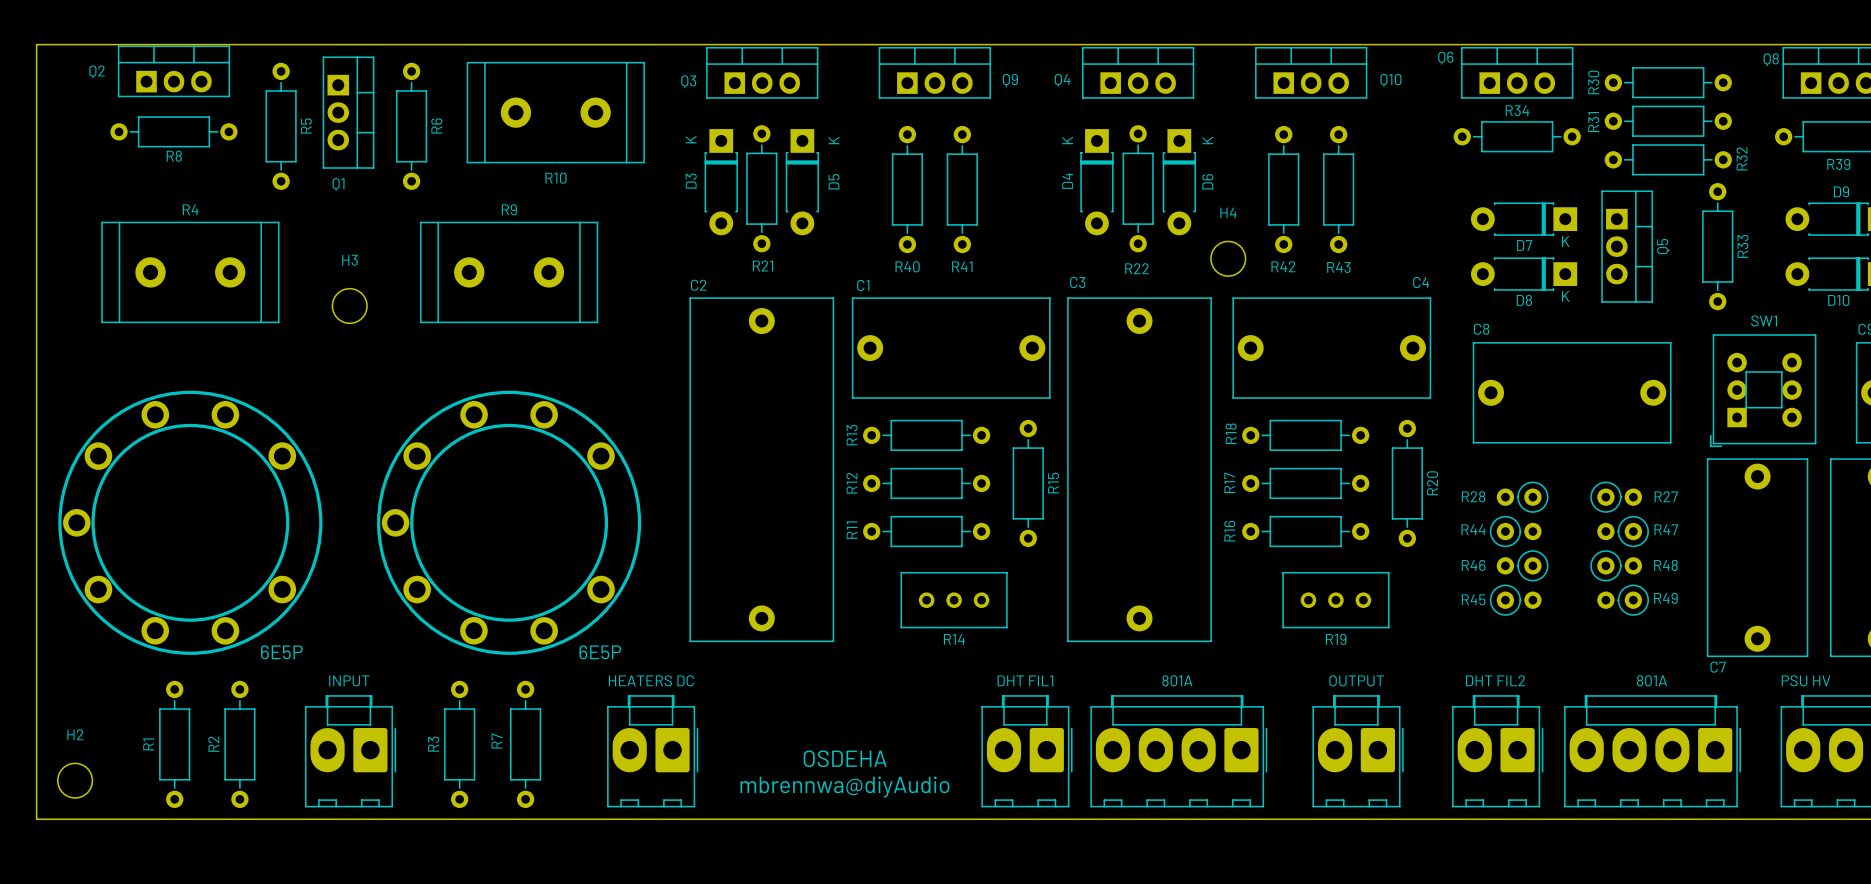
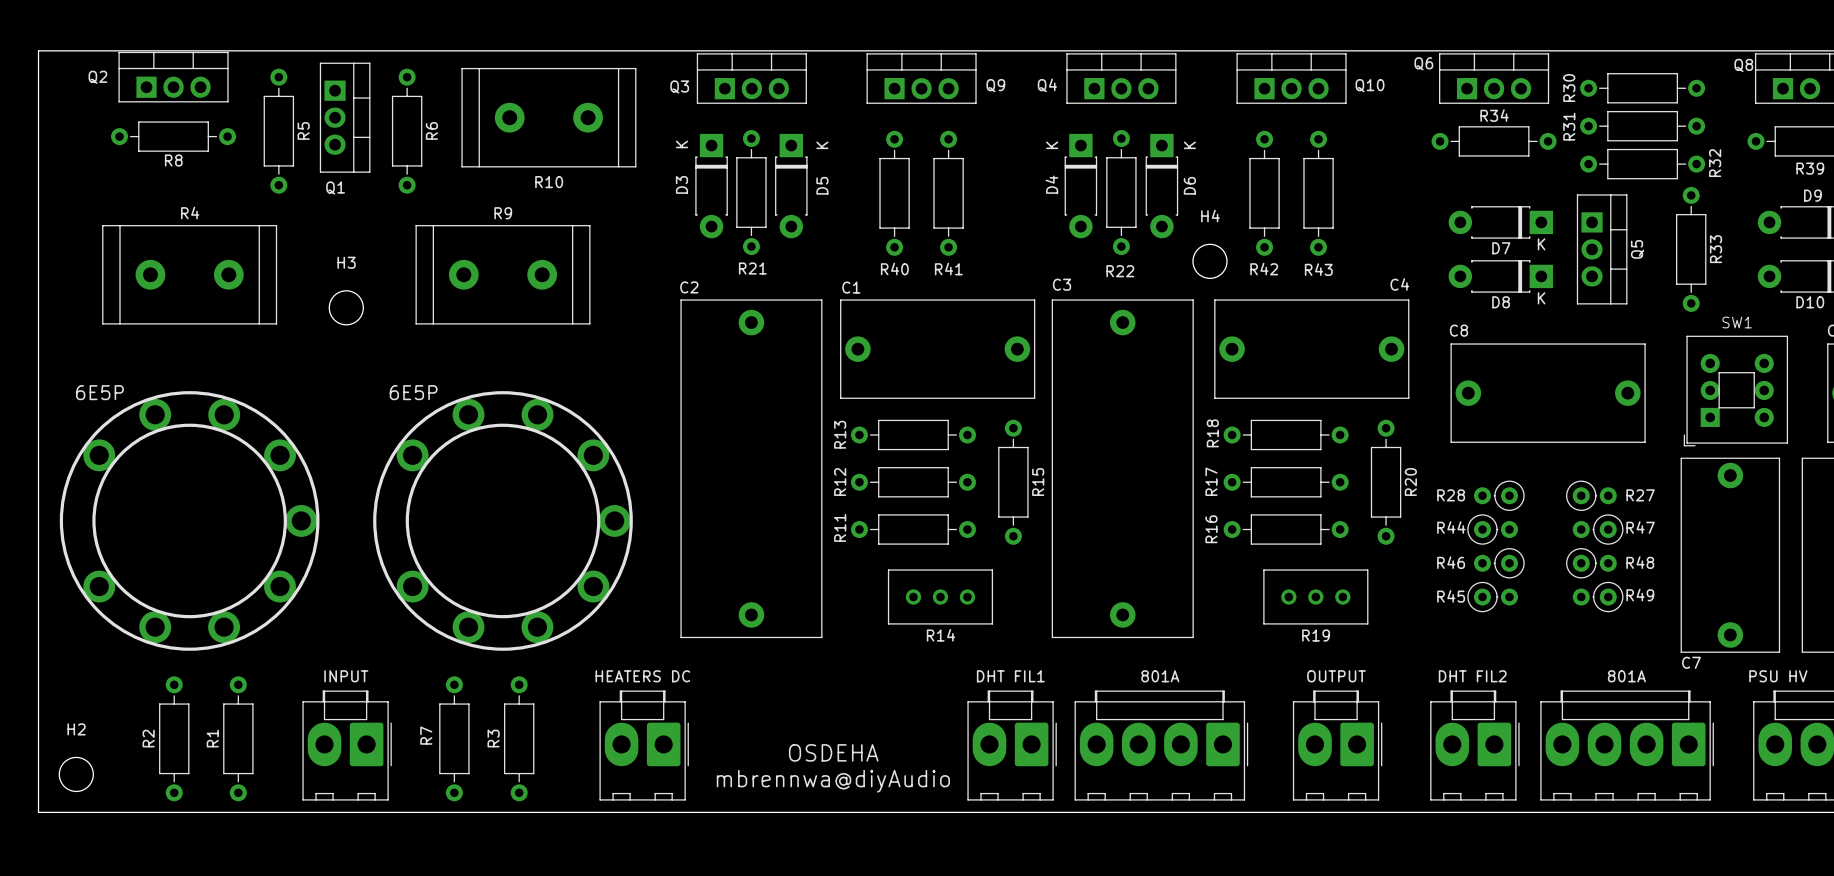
part footprint: [58, 390, 323, 655] -> [59, 391, 320, 651]
part footprint: [377, 390, 642, 655] -> [373, 391, 633, 651]
part value position: 6E5P (281, 652) -> 6E5P (99, 392)
part value position: 6E5P (600, 652) -> 6E5P (413, 392)
R7 name: R7 (496, 741) -> R3 (493, 738)
R1 name: R1 (148, 744) -> R2 (148, 738)
R2 name: R2 (213, 744) -> R1 (212, 738)
R3 name: R3 (433, 744) -> R7 (426, 735)

